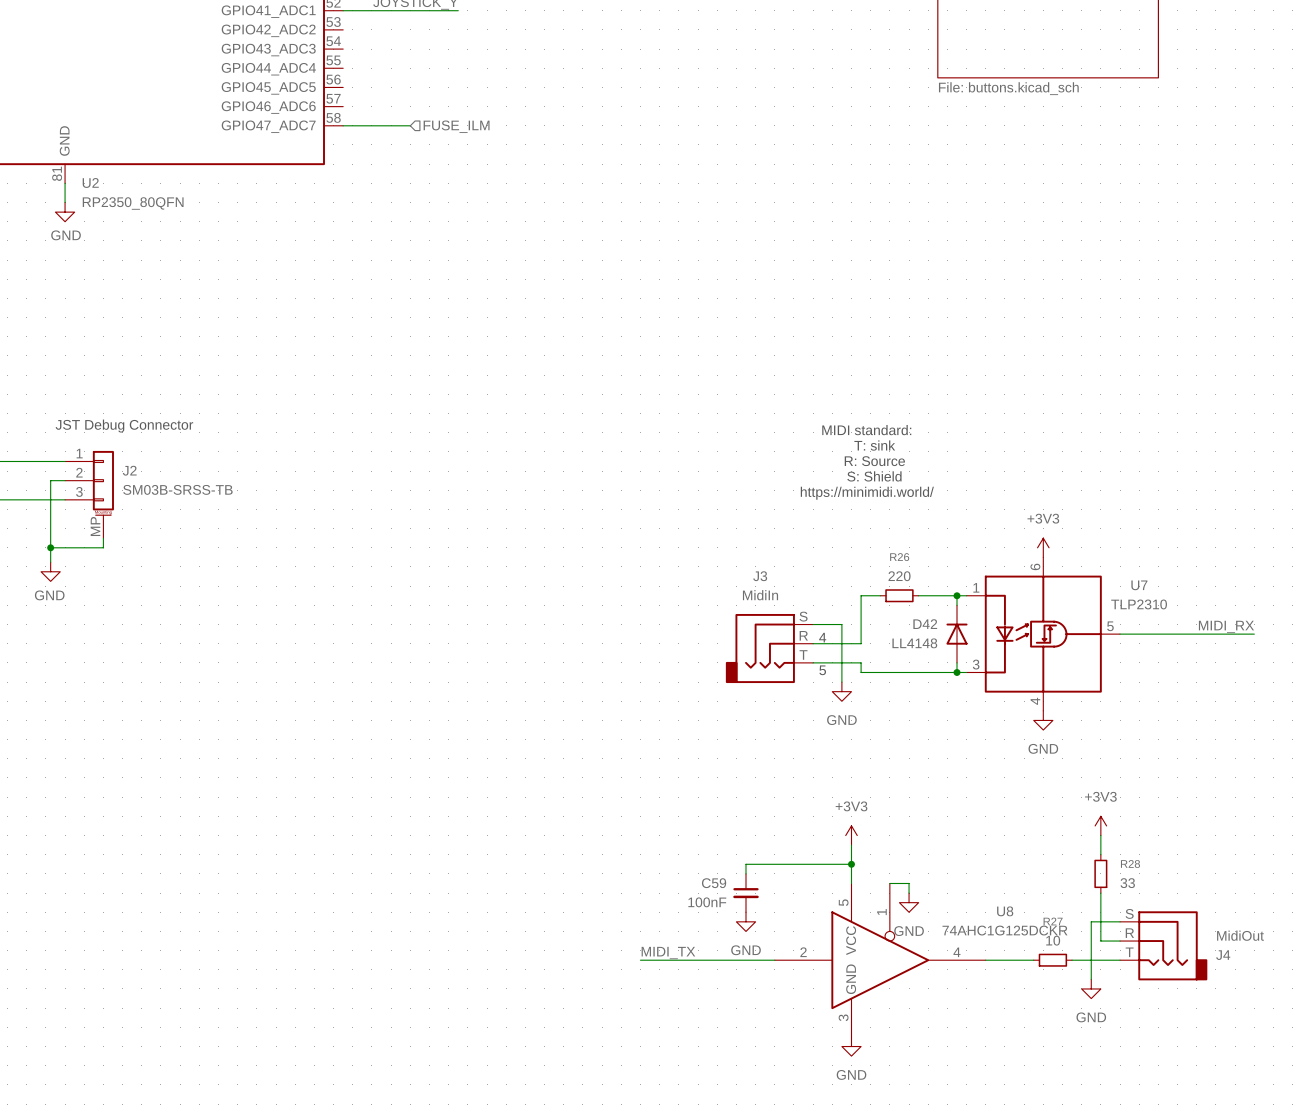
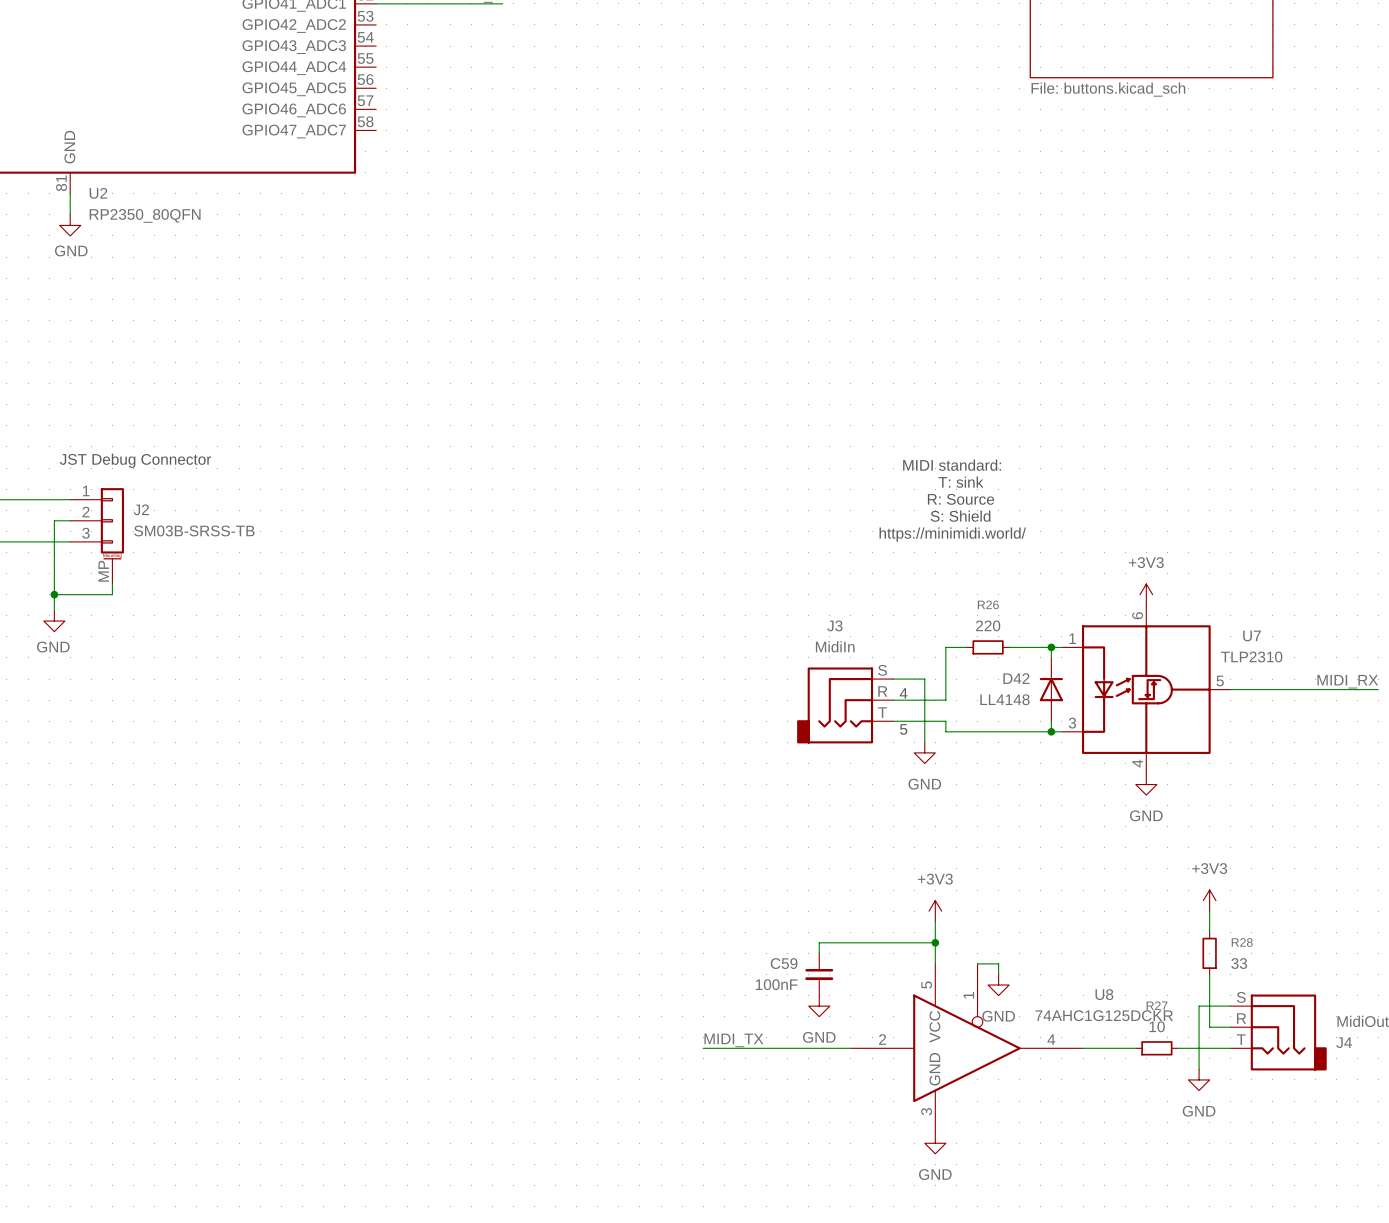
wire: (343, 125) (410, 125) -> none
hierarchical label: FUSE_ILM (456, 126) -> none

